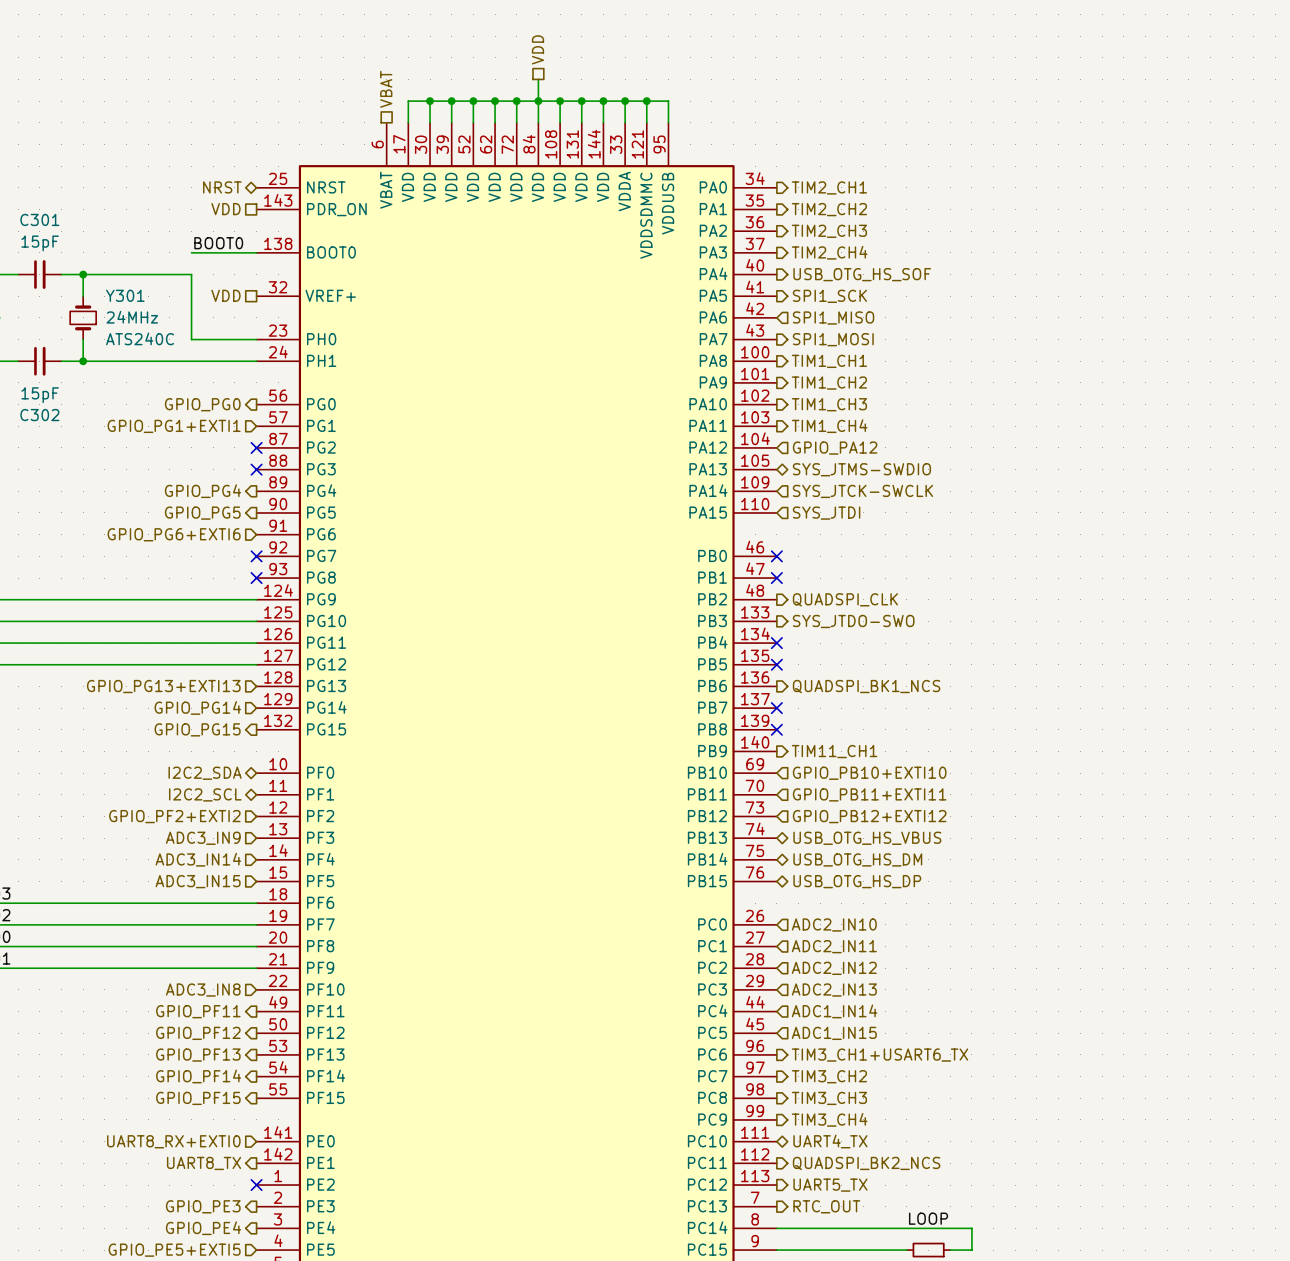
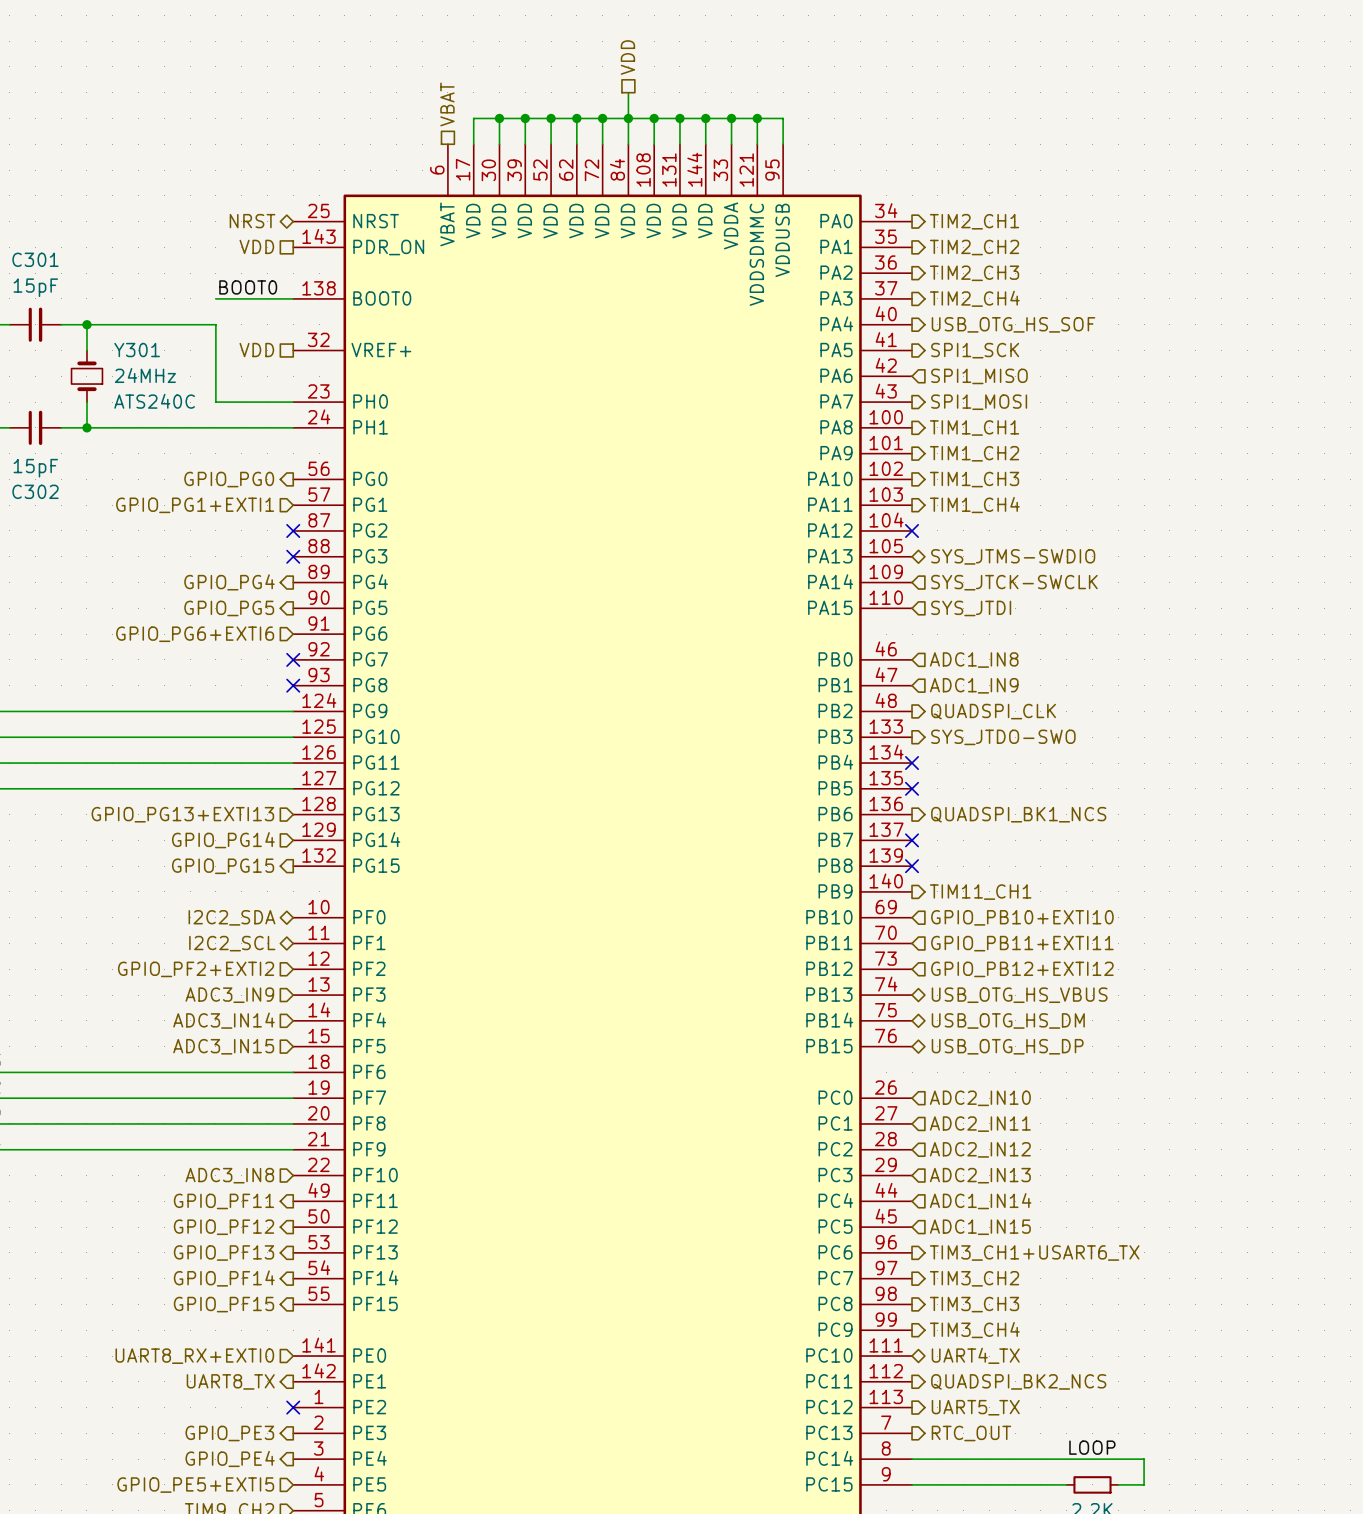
no-connect mark: none -> (912, 530)
hierarchical label: GPIO_PA12 (835, 448) -> none
no-connect mark: (776, 556) -> none
hierarchical label: none -> ADC1_IN8 (974, 660)
no-connect mark: (776, 578) -> none
hierarchical label: none -> ADC1_IN9 (974, 685)

